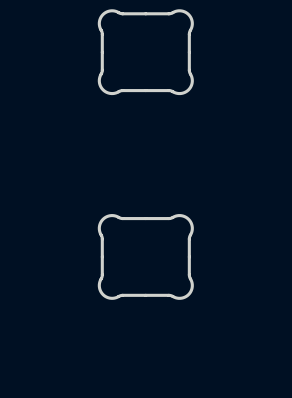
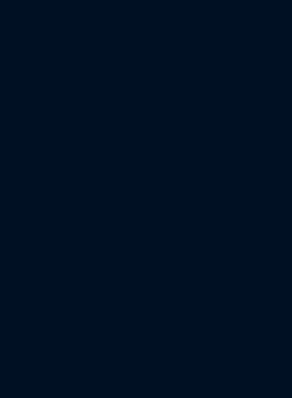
part: (145, 52) -> none
part: (145, 256) -> none

